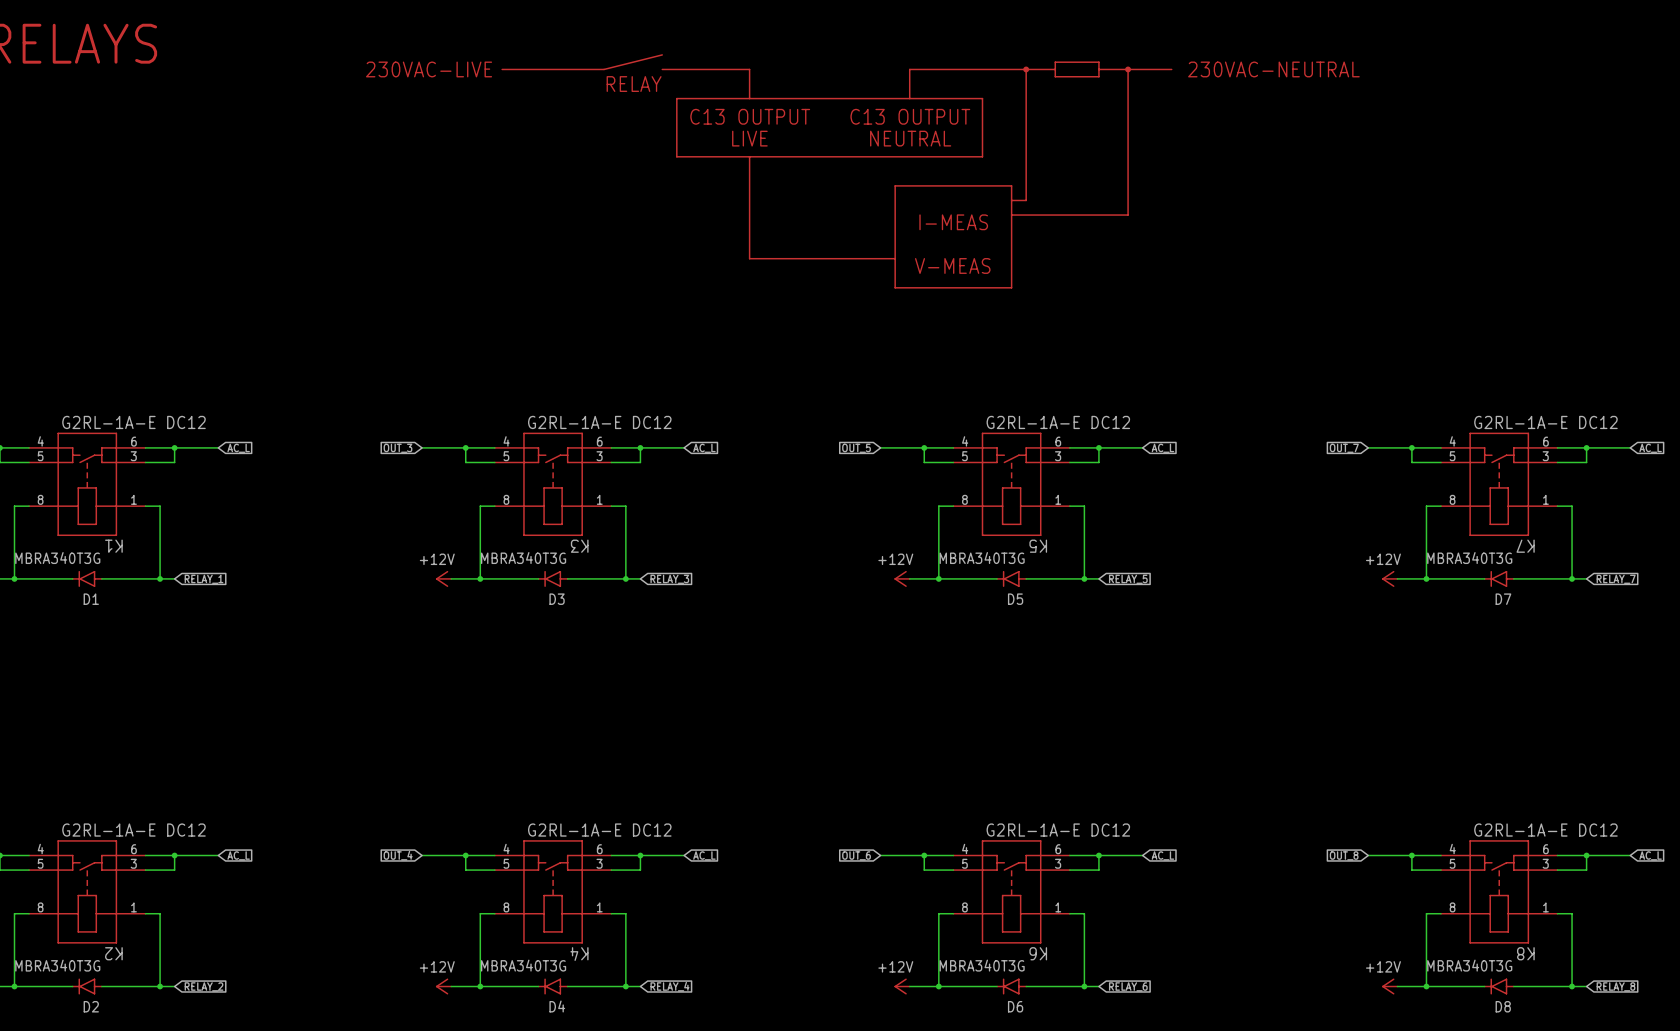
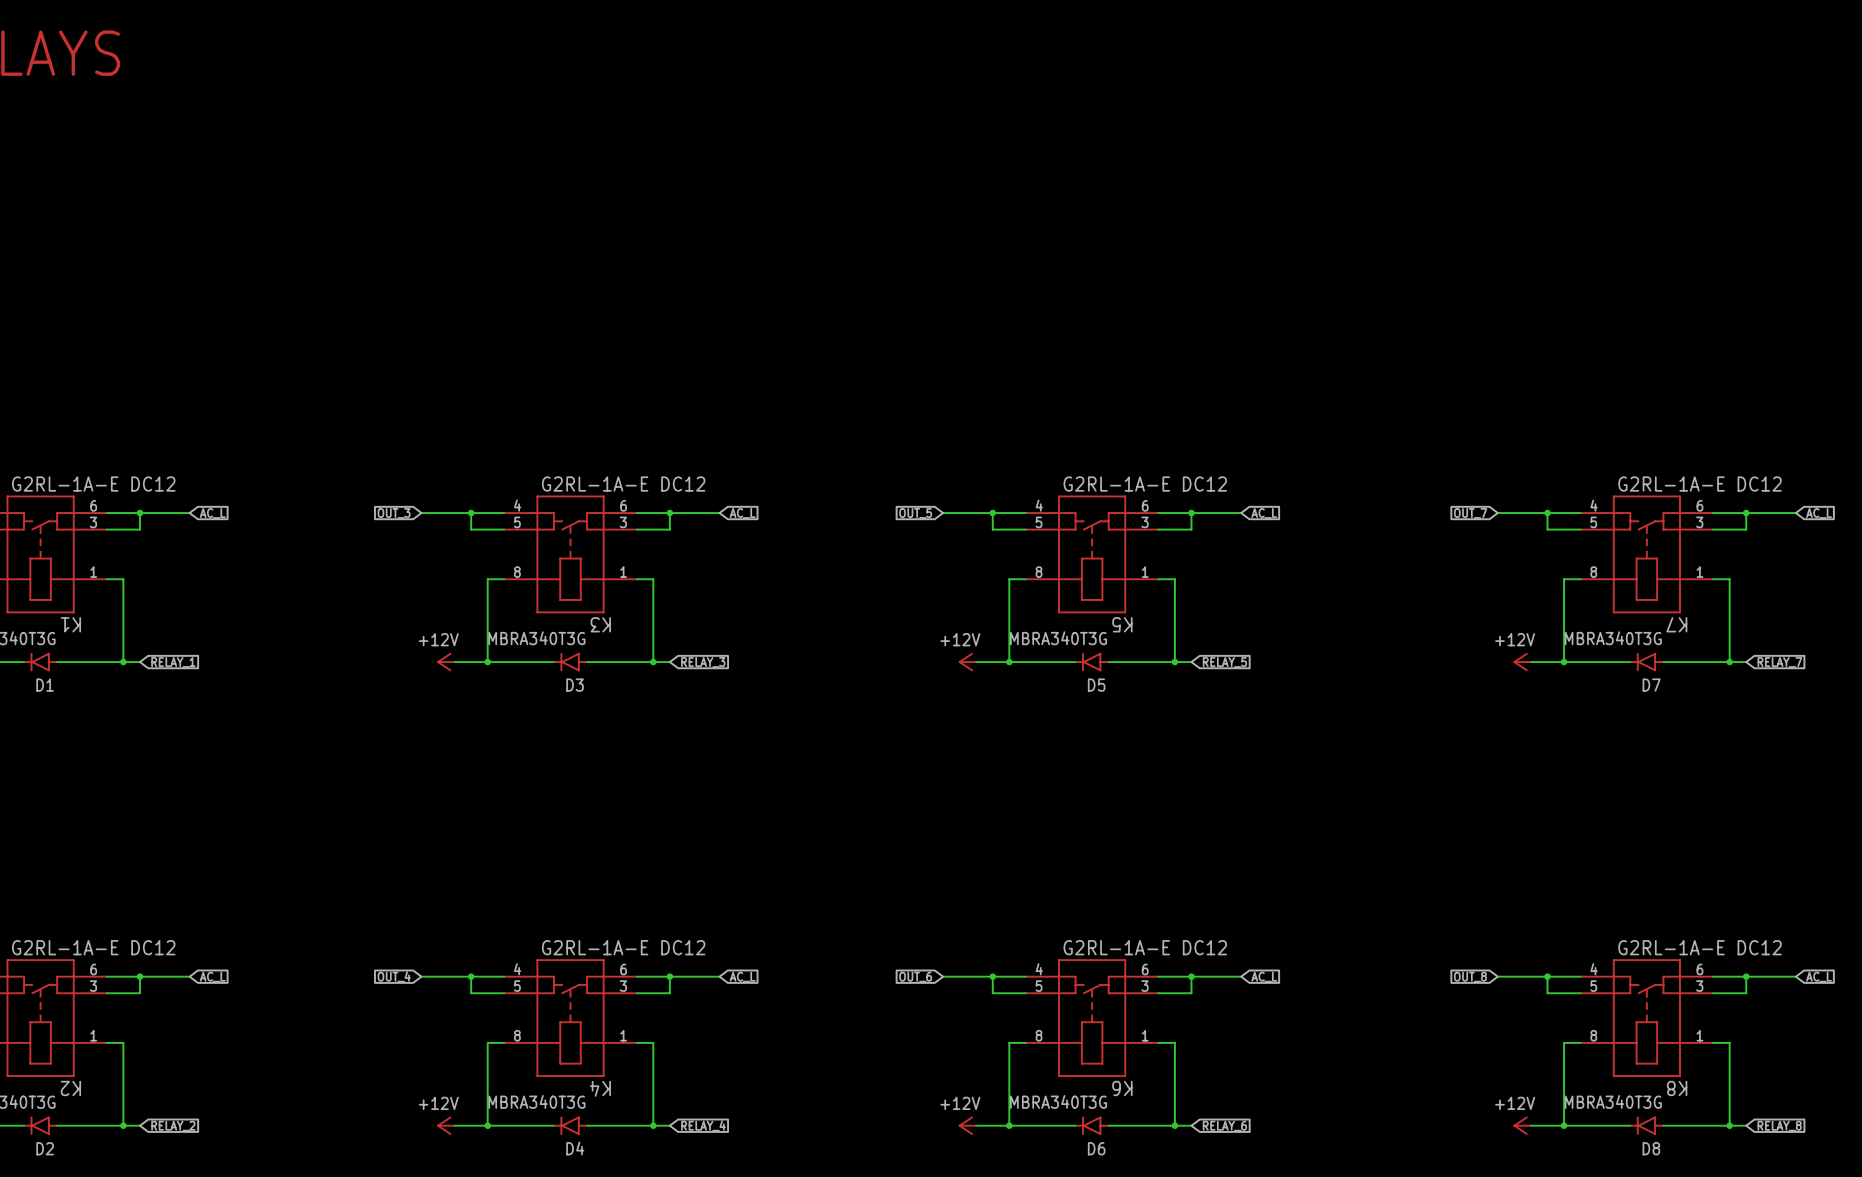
line: (662, 54) (604, 69) (502, 69) -> none
line: (1055, 62) (1055, 76) (1098, 76) (1098, 62) (1055, 62) -> none
drawing: [1023, 66, 1030, 73] -> none
drawing: [1125, 66, 1131, 73] -> none
text: 230VAC-LIVE (429, 69) -> none
line: (662, 69) (749, 69) (749, 98) -> none
line: (1026, 69) (1026, 200) (1011, 200) -> none
line: (1055, 69) (909, 69) (909, 98) -> none
line: (1098, 69) (1171, 69) -> none
line: (1128, 69) (1128, 215) (1011, 215) -> none
text: 230VAC-NEUTRAL (1273, 69) -> none
text: RELAY (634, 84) -> none
line: (676, 98) (982, 98) (982, 156) (676, 156) (676, 98) -> none
text: C13 OUTPUT (750, 116) -> none
text: C13 OUTPUT (910, 116) -> none
text: LIVE (749, 138) -> none
text: NEUTRAL (910, 138) -> none
line: (749, 156) (749, 258) (895, 258) -> none
line: (895, 185) (1011, 185) (1011, 287) (895, 287) (895, 185) -> none
text: I-MEAS (953, 222) -> none
text: V-MEAS (952, 265) -> none

